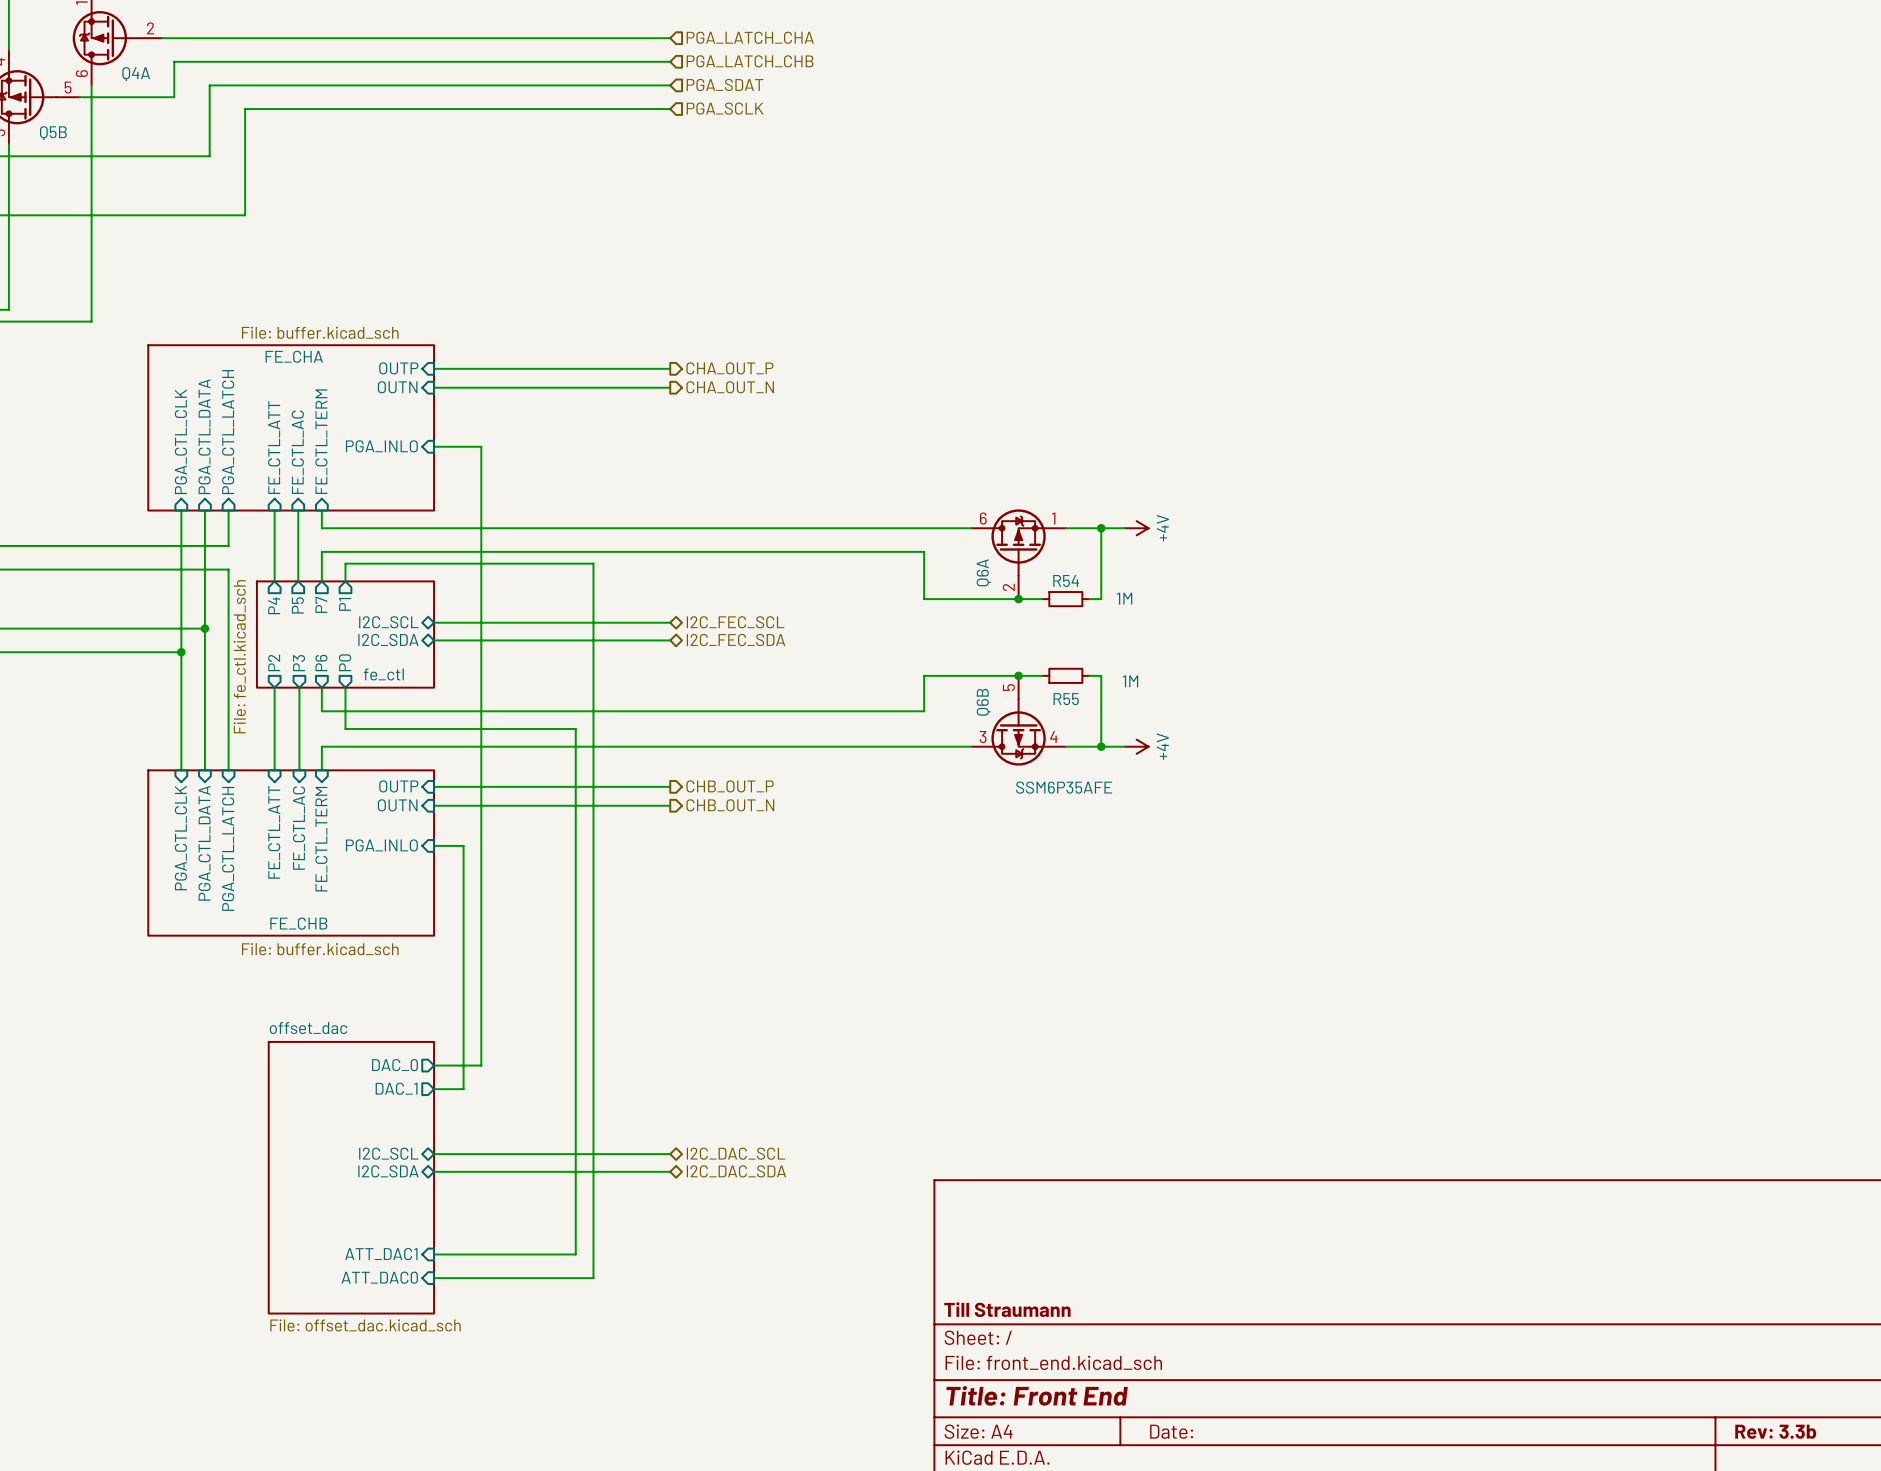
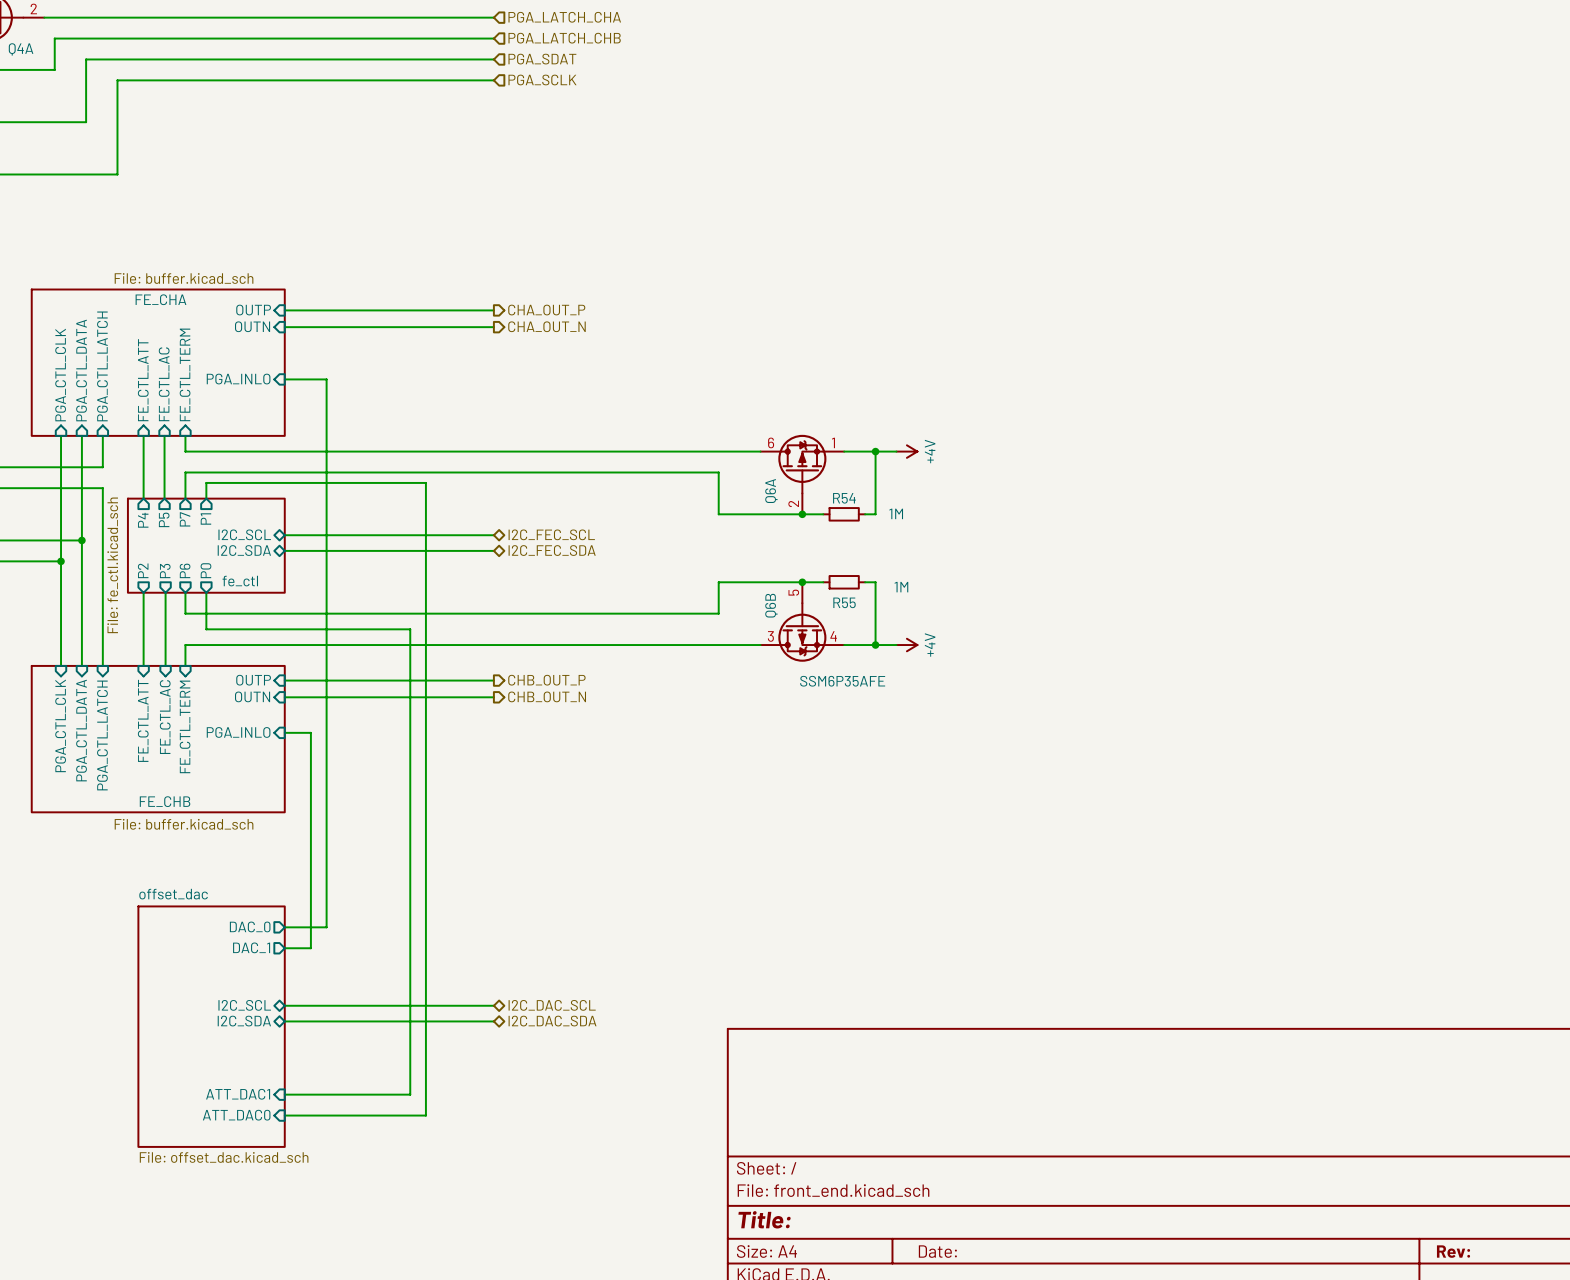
title block: Till Straumann (1007, 1309) -> none
title block: Title: Front End (1037, 1395) -> Title: (764, 1219)
title block: Rev: 3.3b (1775, 1431) -> Rev: (1453, 1251)

